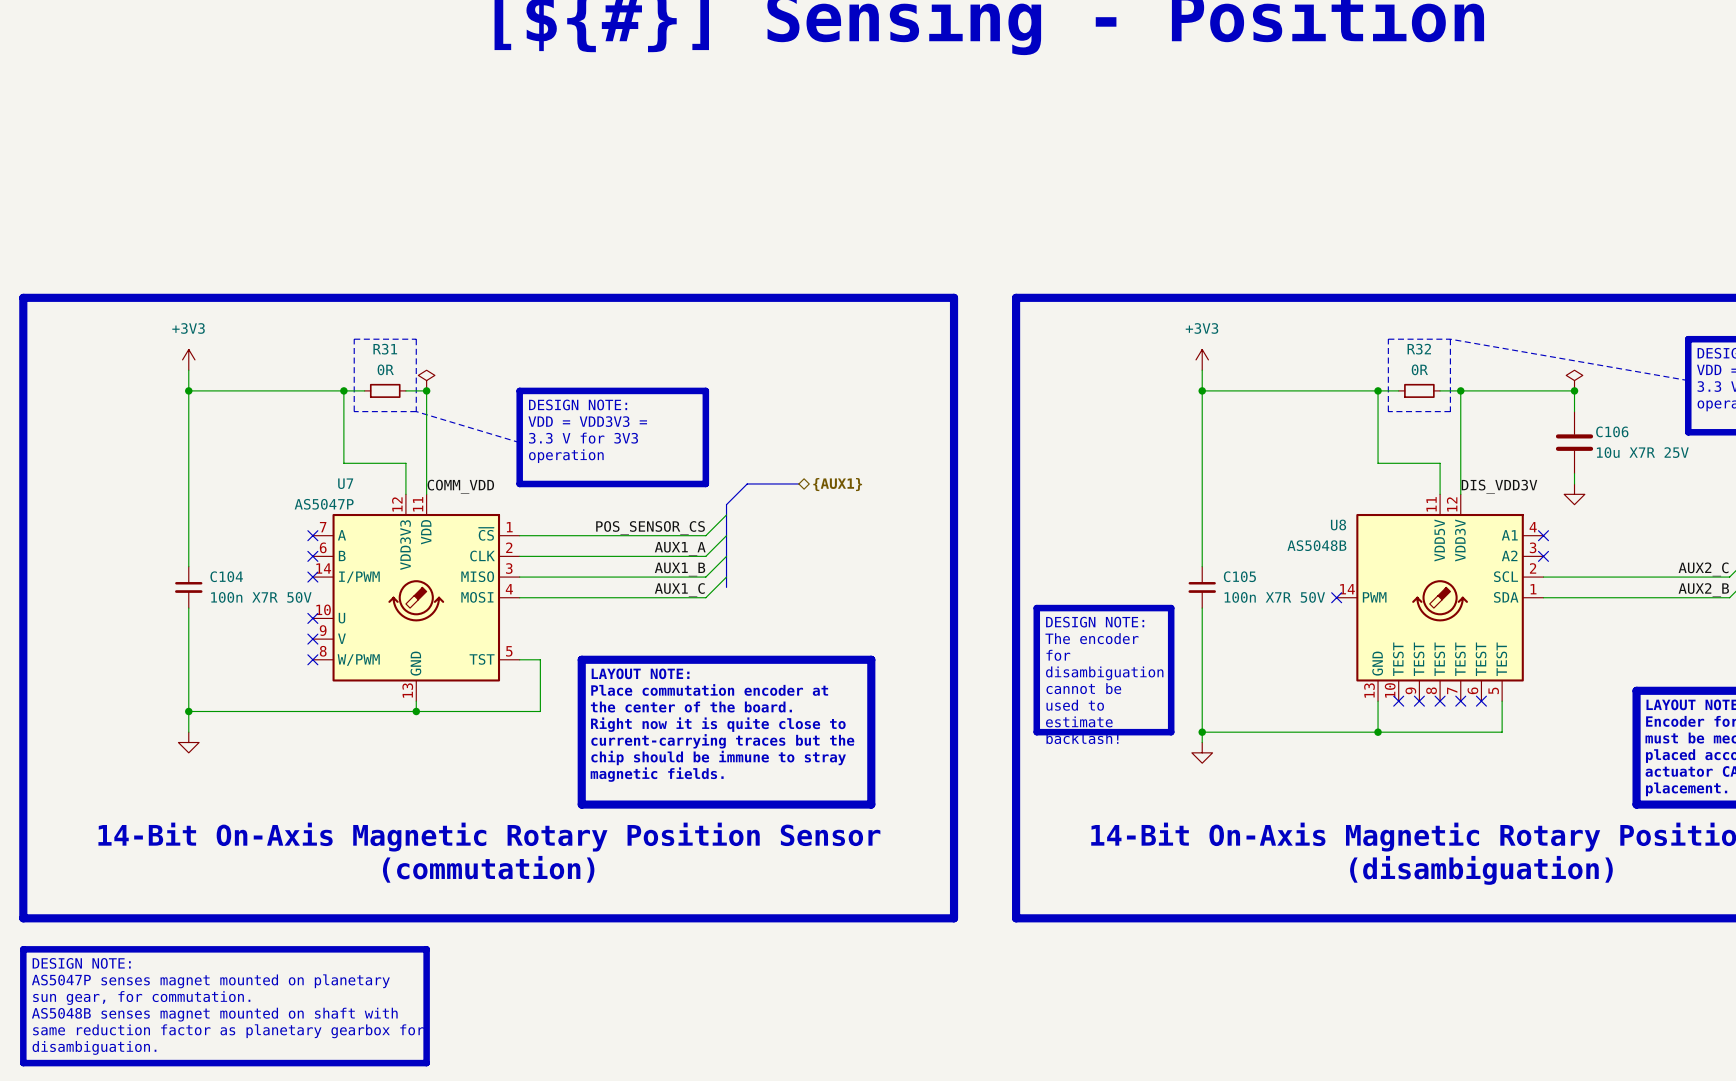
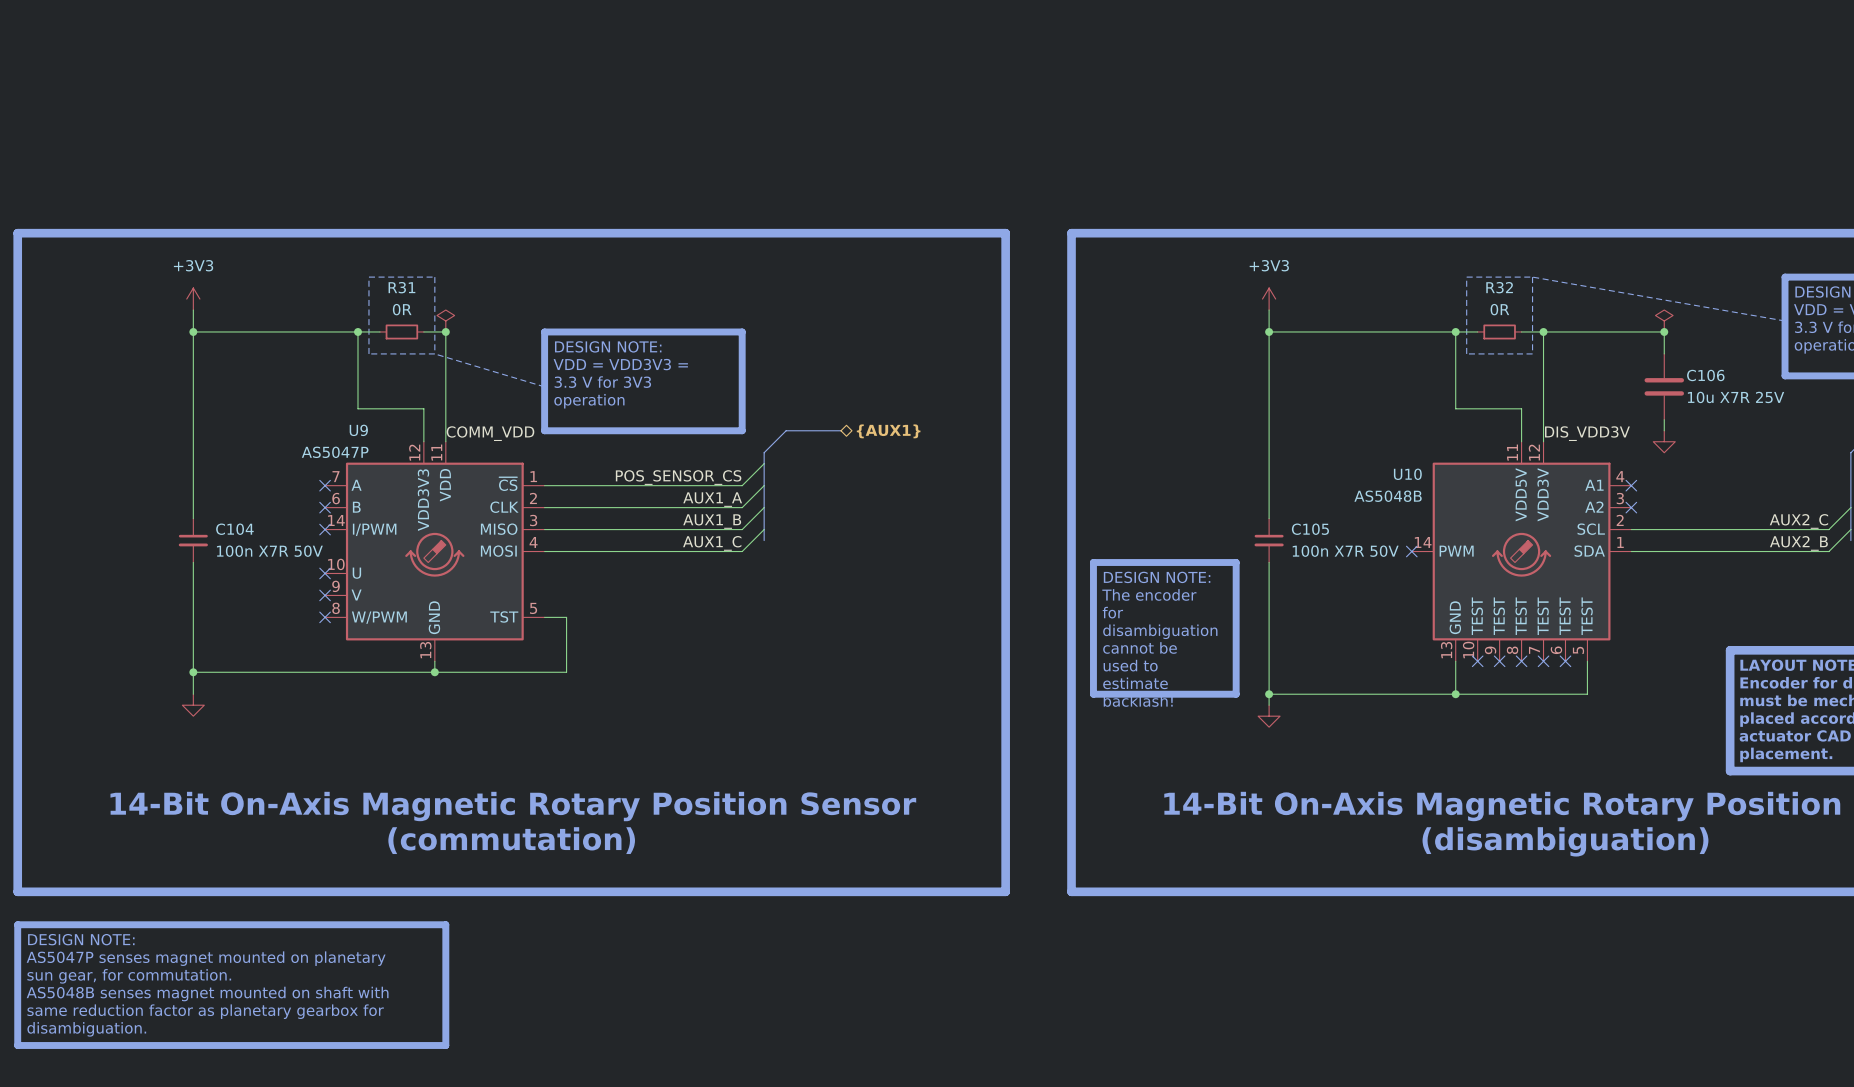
U7 name: U7 (345, 483) -> U9 (358, 430)
U8 name: U8 (1338, 524) -> U10 (1407, 474)
line: (581, 659) (871, 659) (871, 804) (581, 804) (581, 659) -> none
text: LAYOUT NOTE: (640, 673) -> none
text: Place commutation encoder at (709, 689) -> none
text: the center of the board. (691, 707) -> none
text: Right now it is quite close to (718, 724) -> none
text: current-carrying traces but the (722, 741) -> none
text: chip should be immune to stray (718, 757) -> none
text: magnetic fields. (657, 774) -> none

